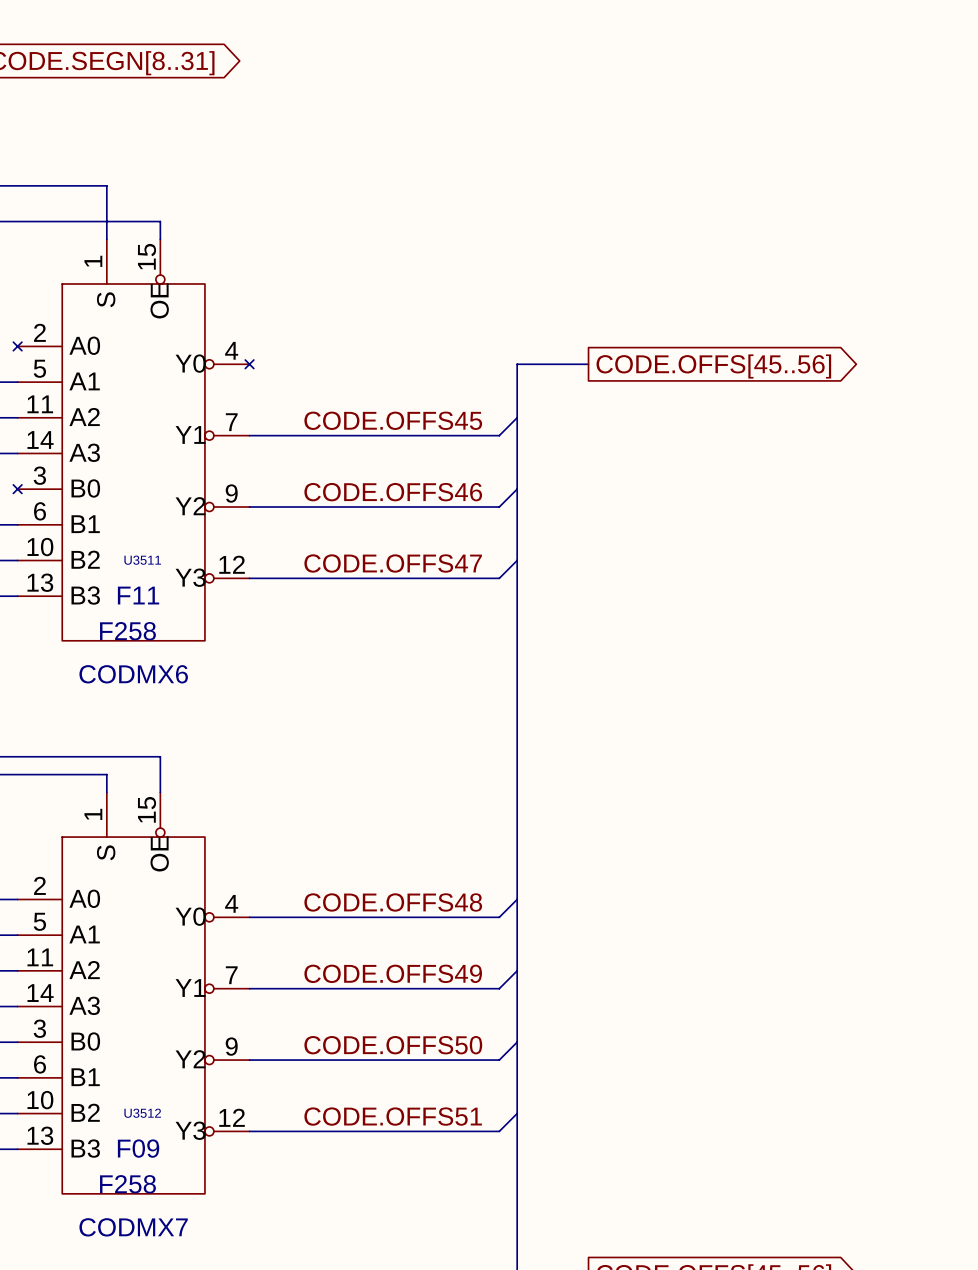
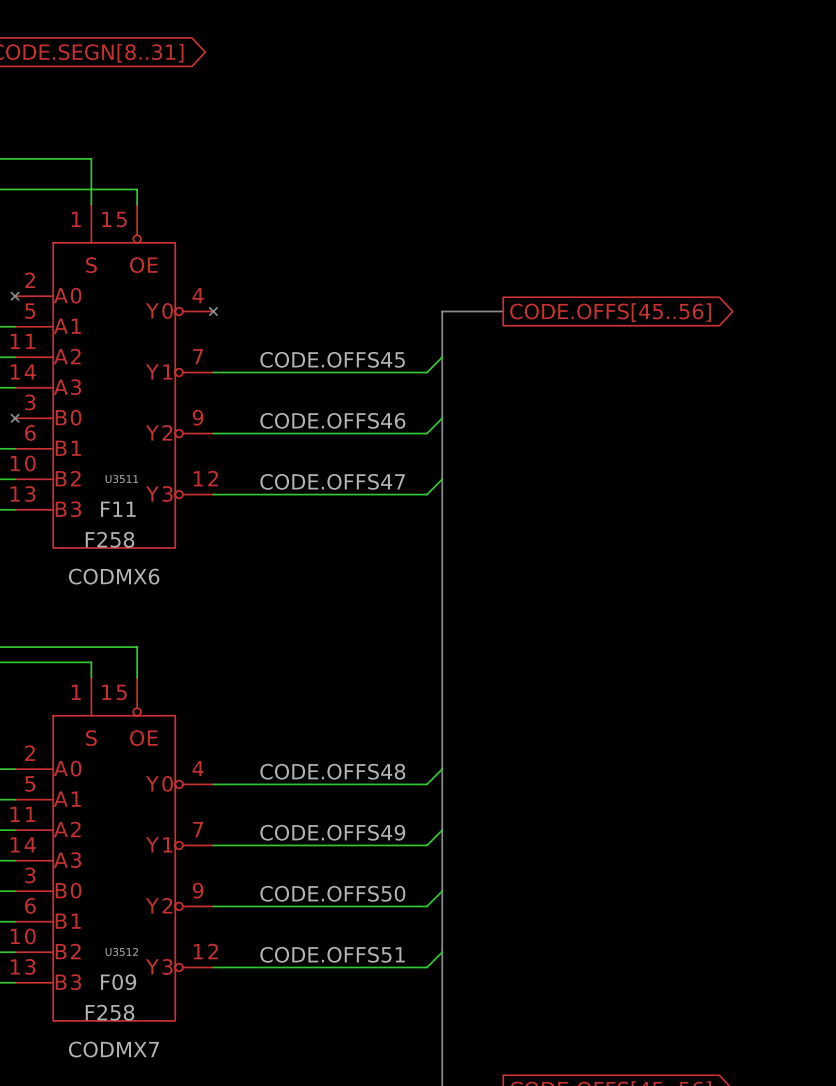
U3511 symbol: [17, 239, 250, 641] -> [15, 204, 214, 548]
U3512 symbol: [17, 792, 250, 1194] -> [15, 677, 214, 1021]

